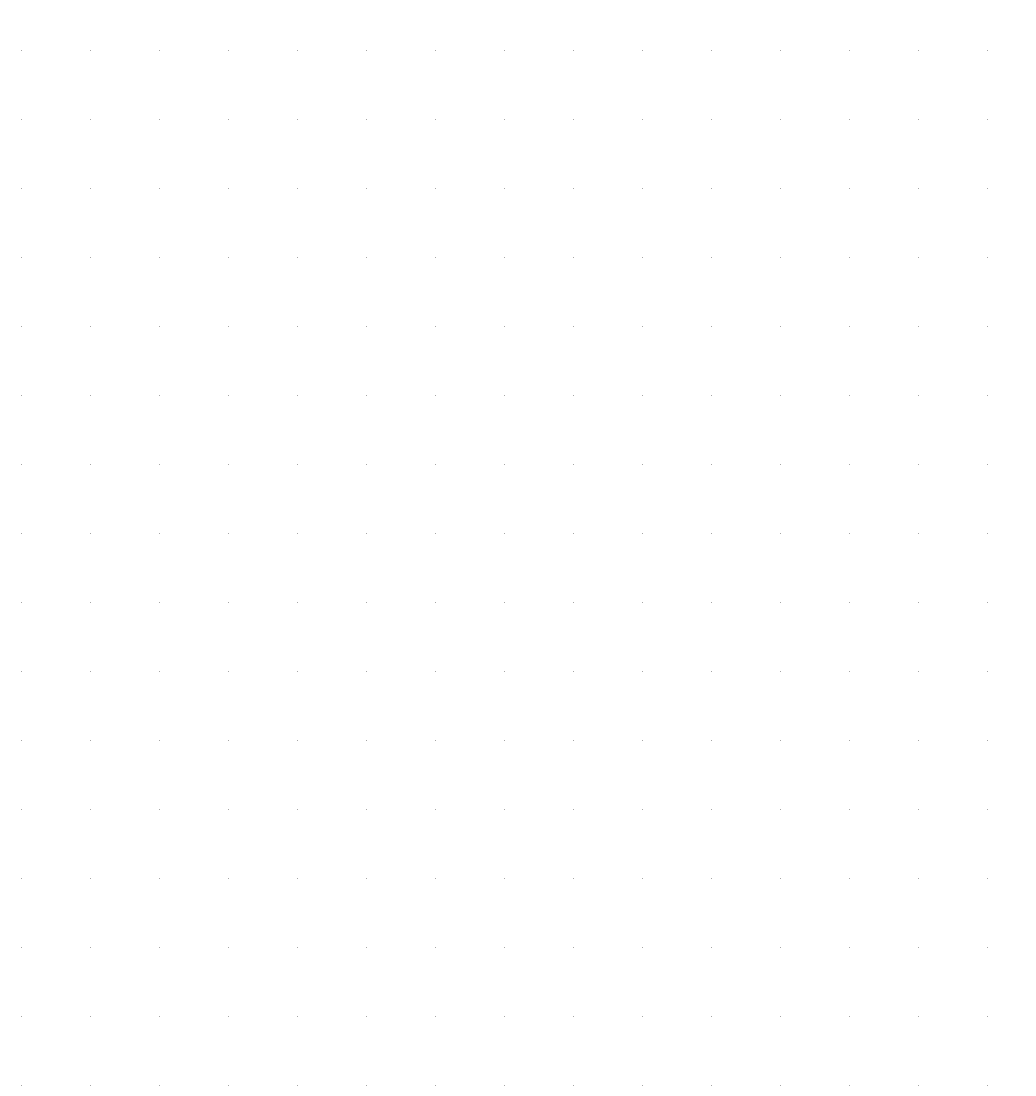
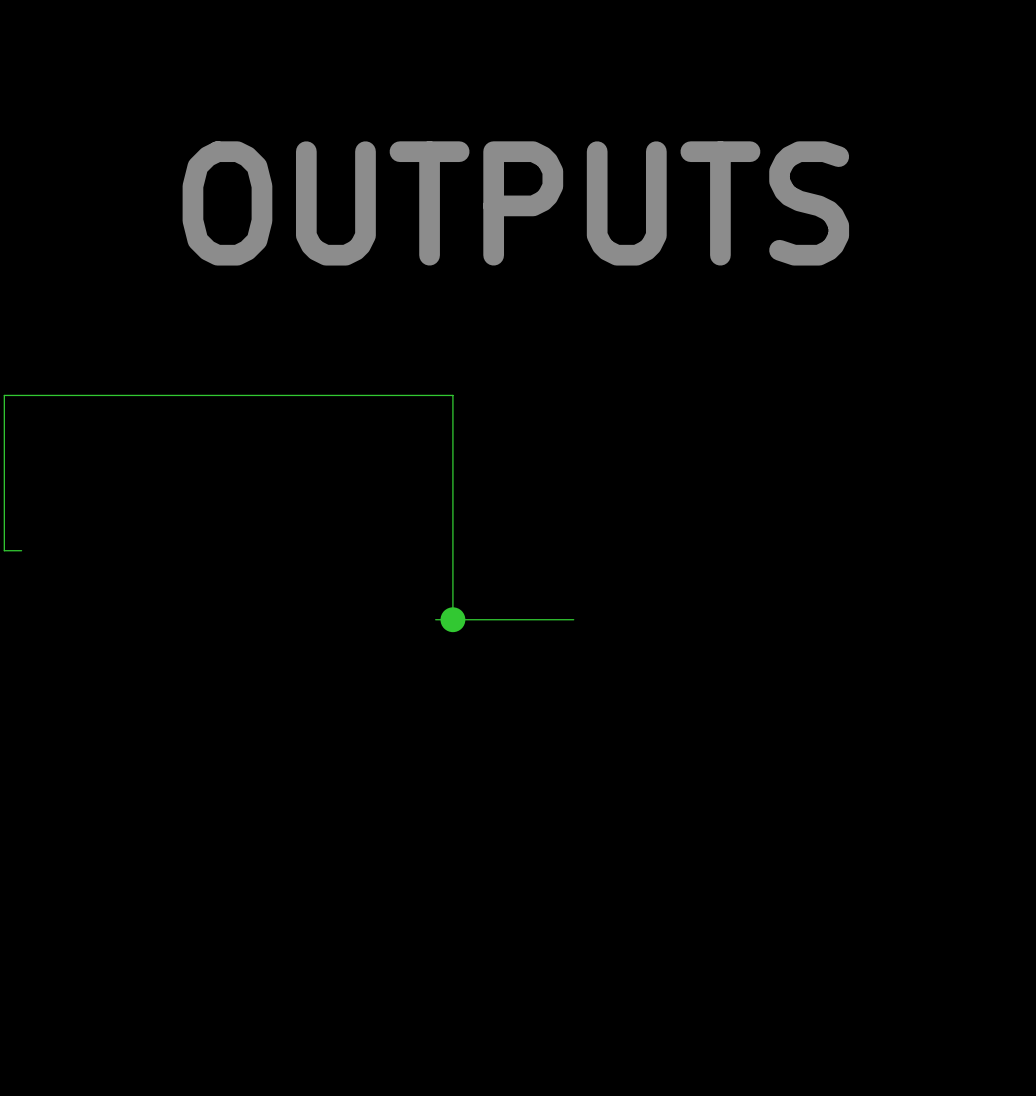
text: none -> OUTPUTS (515, 203)
wire: none -> (21, 550) (4, 550) (4, 395) (452, 395) (452, 619)
wire: none -> (435, 619) (573, 619)
junction: none -> (452, 619)

